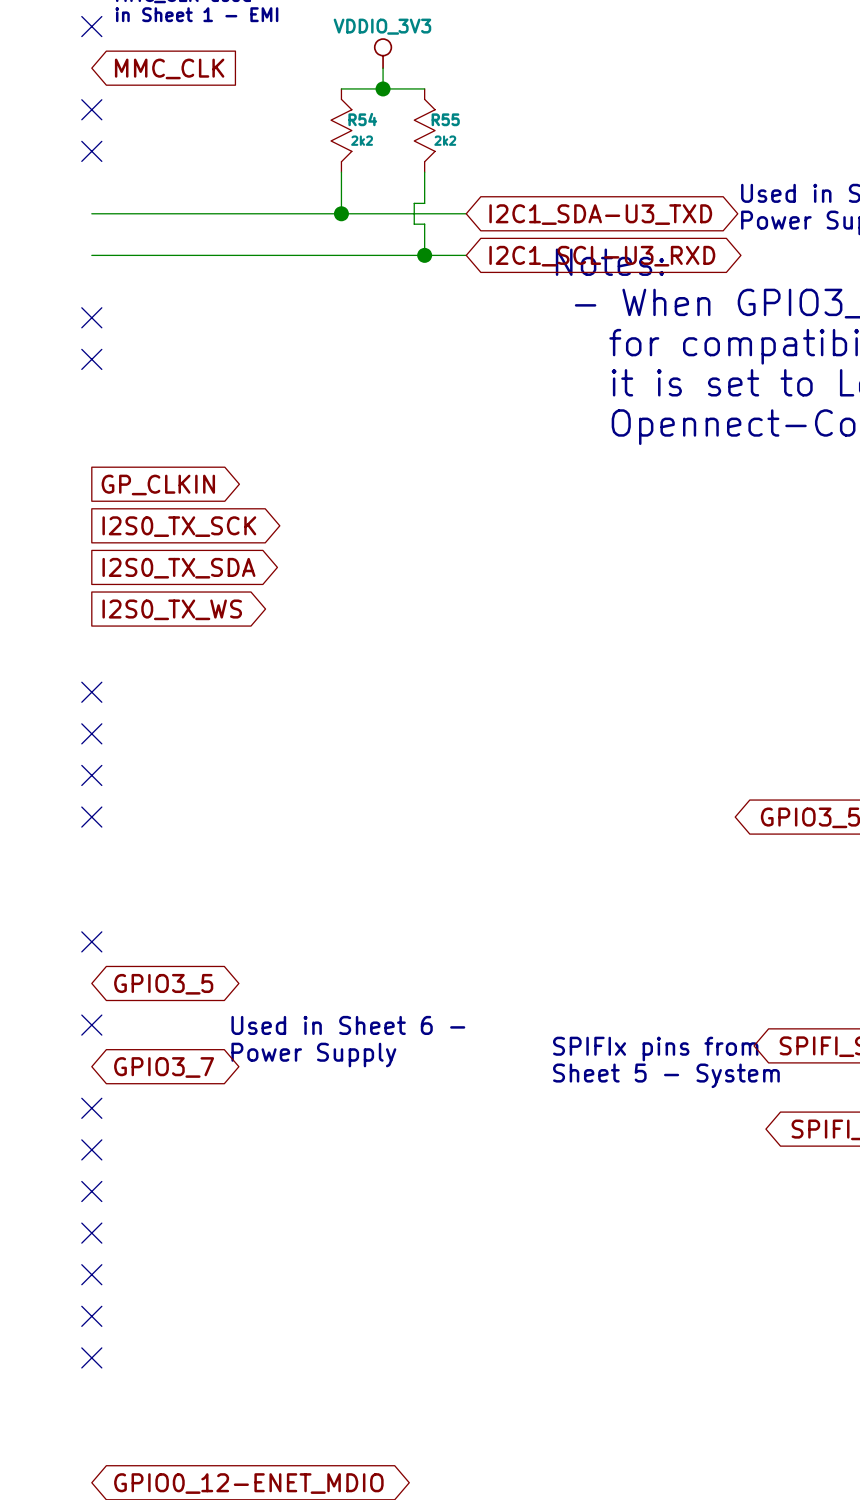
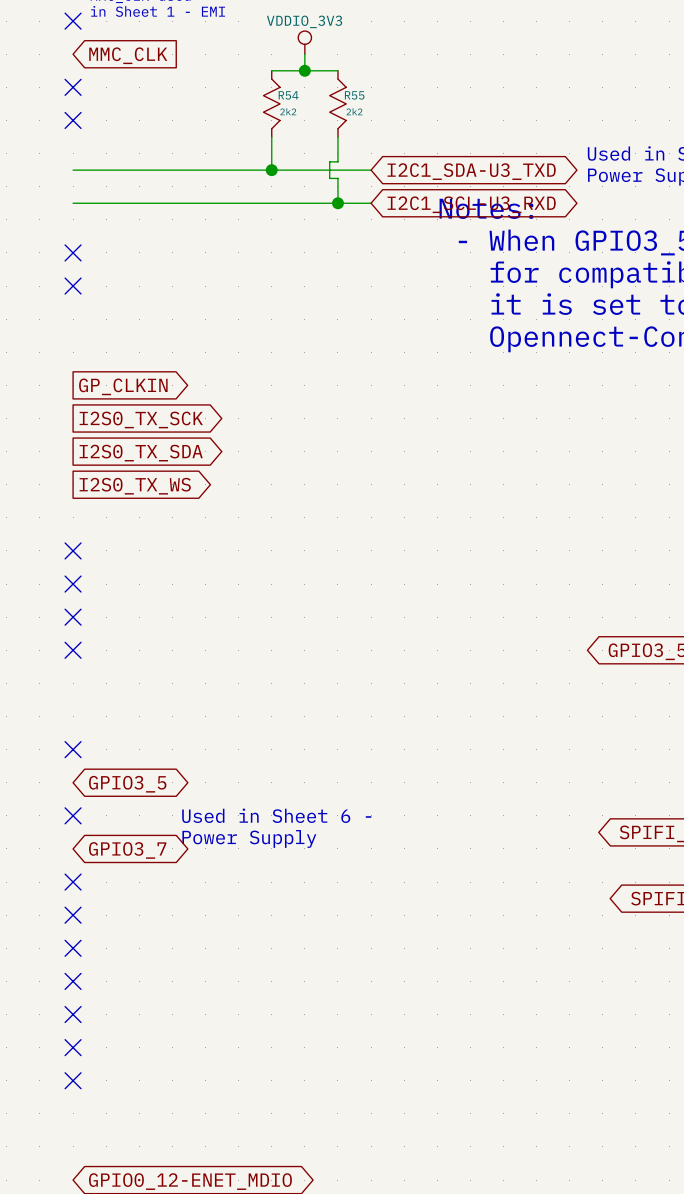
text: SPIFIx pins from (655, 1049) -> none
text: Sheet 5 - System (666, 1075) -> none

